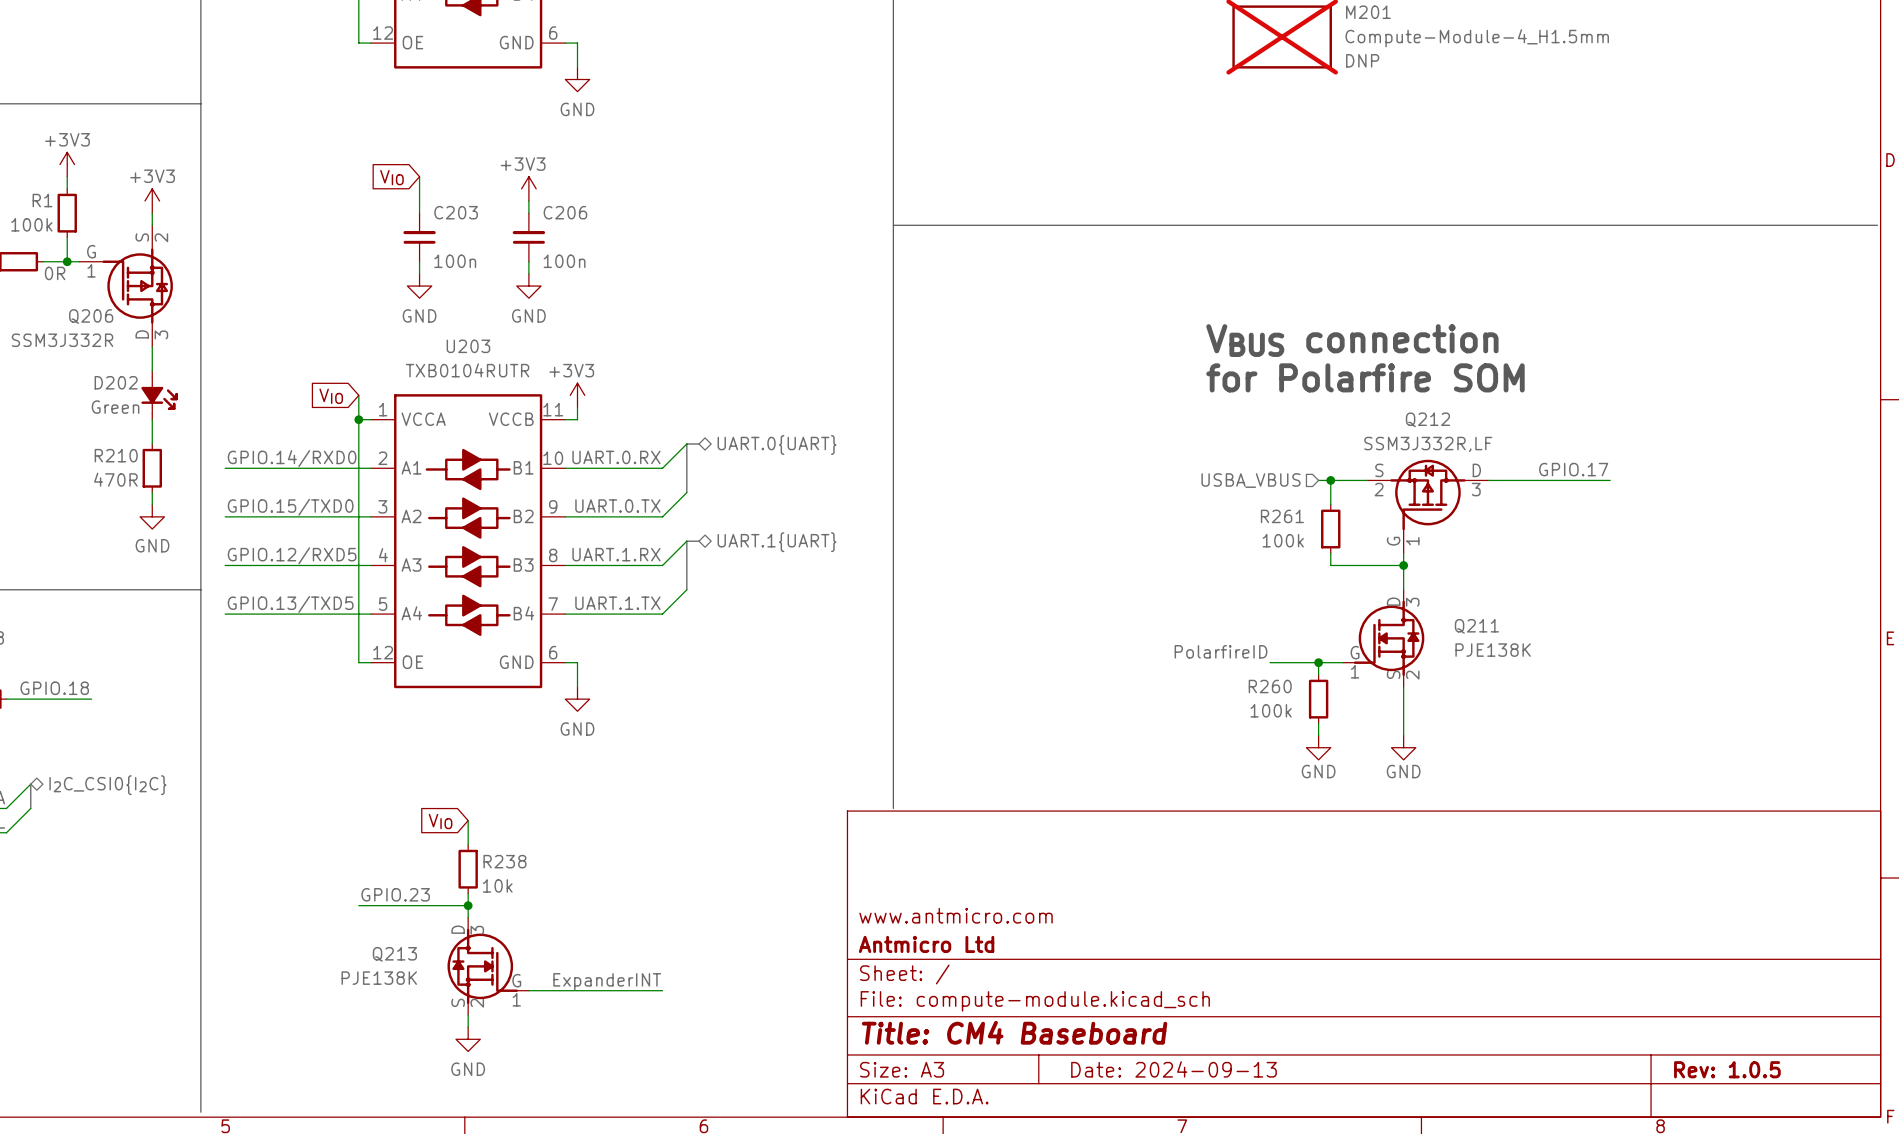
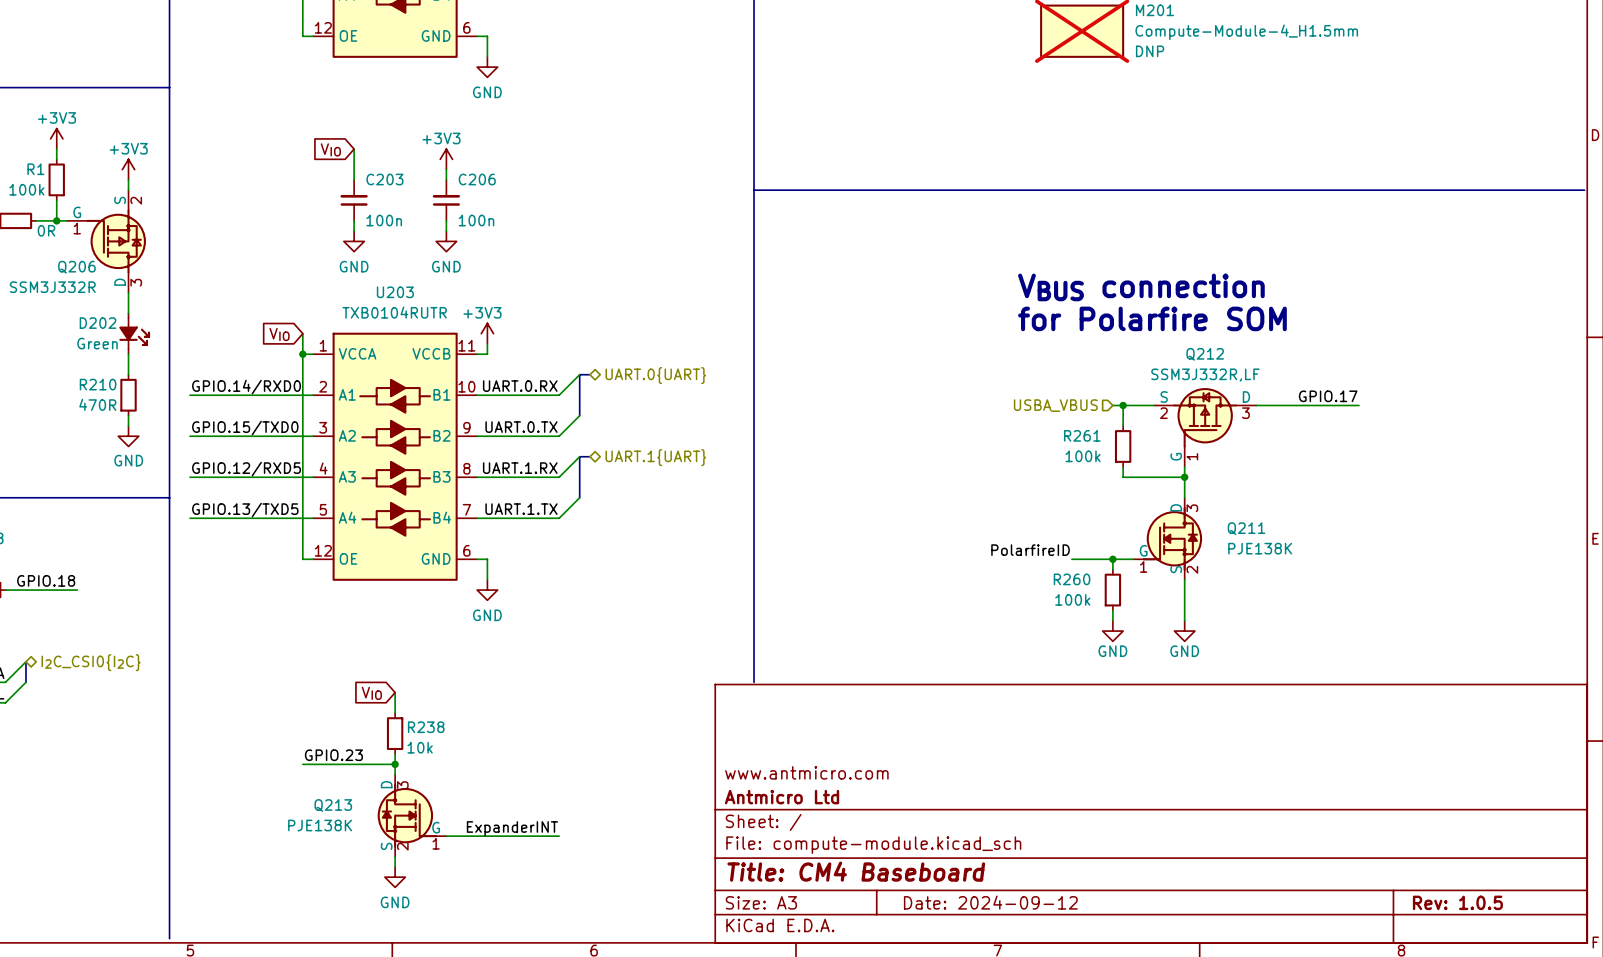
title block: Date: 2024-09-13 (1174, 1069) -> Date: 2024-09-12 (990, 902)

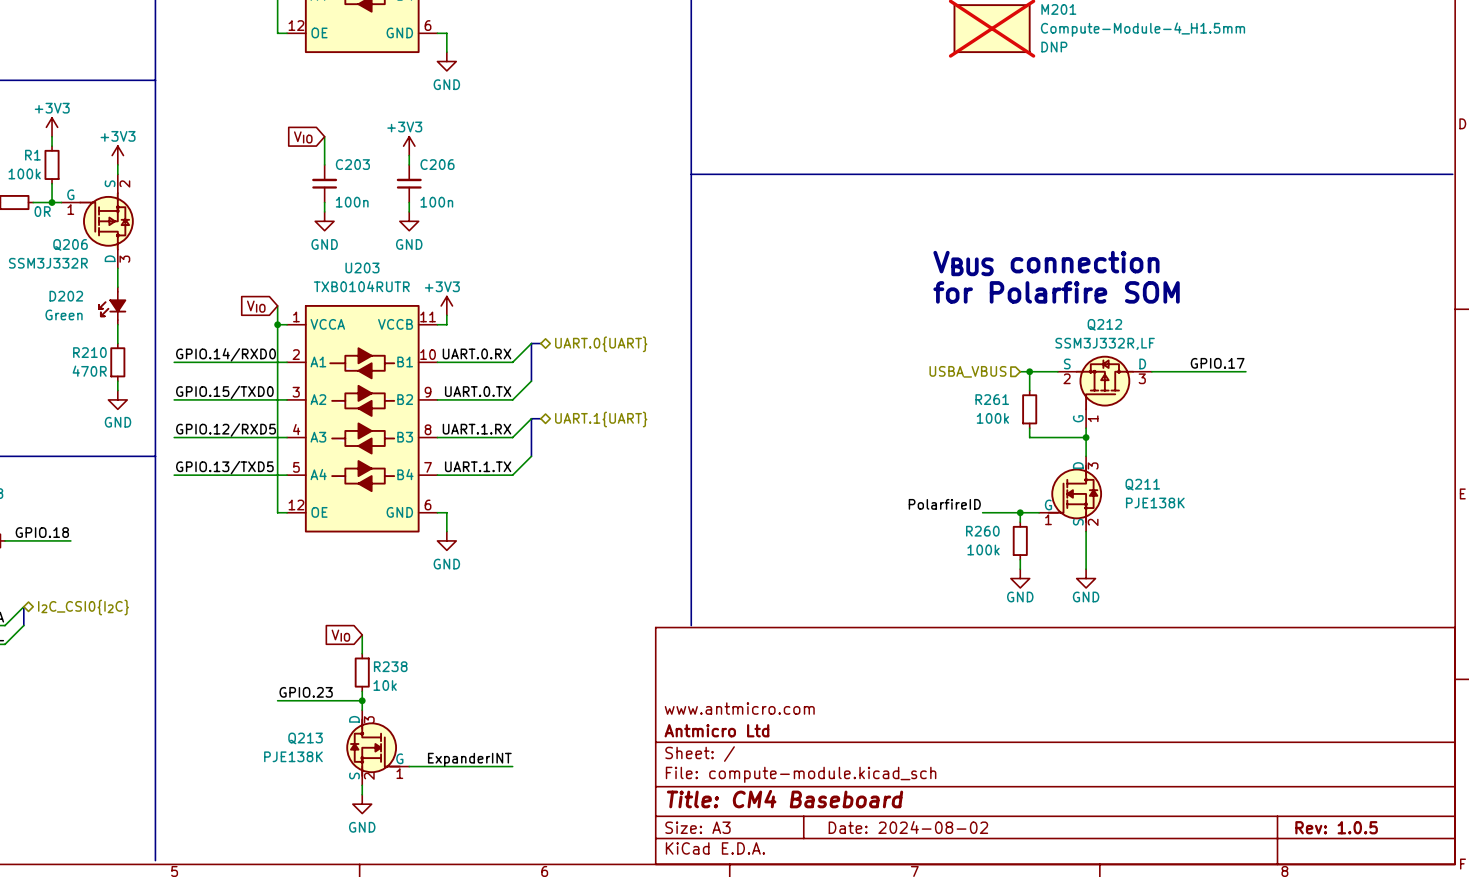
D202 flip: as is (134, 333) -> left-right (112, 305)
D202 text position: Green (97, 343) -> Green (64, 314)
title block: Date: 2024-09-12 (990, 902) -> Date: 2024-08-02 (908, 827)

